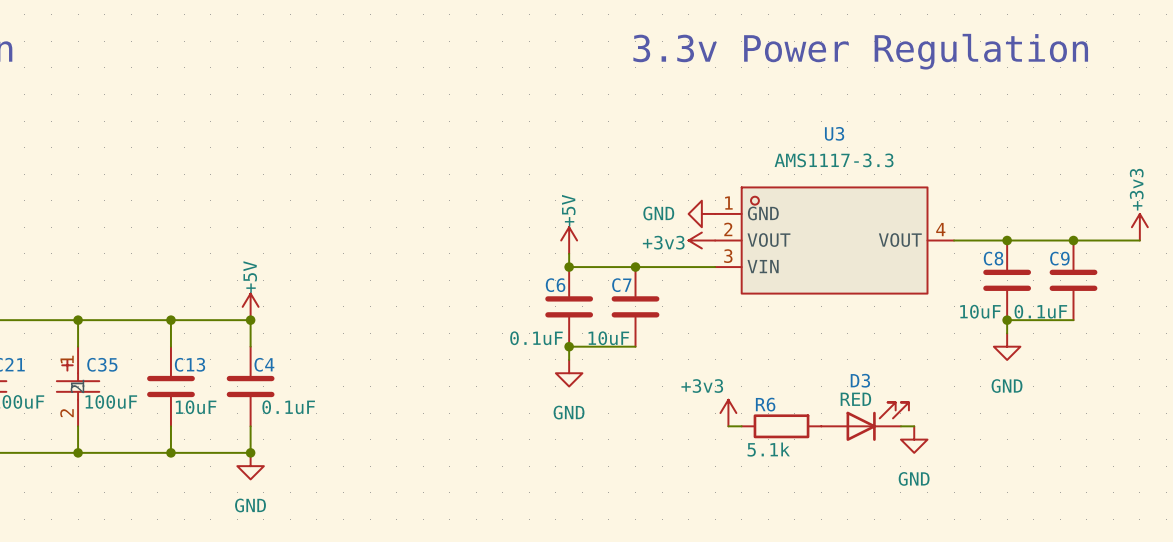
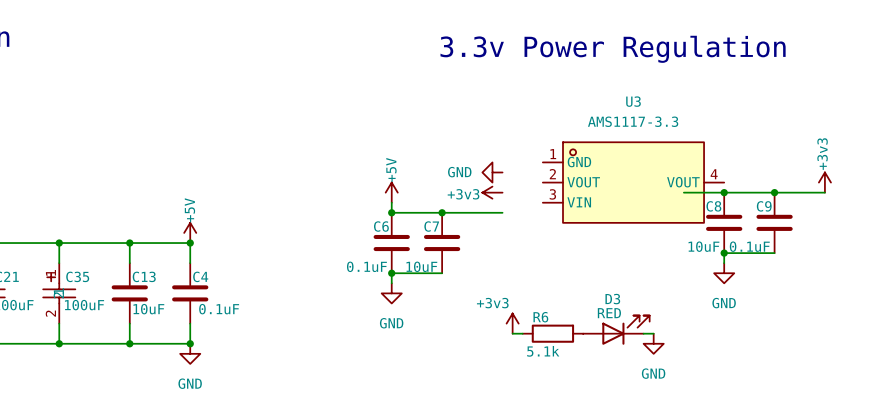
text position: 3.3v Power Regulation (860, 51) -> 3.3v Power Regulation (613, 49)
power symbol position: GND (701, 213) -> GND (492, 172)
power symbol position: +3v3 (1139, 227) -> +3v3 (824, 182)
power symbol position: +5V (569, 240) -> +5V (391, 192)
power symbol position: +3v3 (701, 240) -> +3v3 (492, 192)
wire: (954, 240) (1139, 240) -> (683, 192) (824, 192)
junction position: (1007, 240) -> (774, 192)
junction: (1073, 240) -> none
wire: (569, 253) (569, 267) (715, 267) -> (391, 202) (391, 212) (502, 212)
junction: none -> (724, 192)
junction position: (569, 267) -> (442, 212)
junction: (635, 267) -> none
junction: none -> (391, 212)
C8 position: (1007, 280) -> (724, 222)
C9 position: (1073, 280) -> (774, 222)
C6 position: (569, 306) -> (391, 243)
C7 position: (635, 306) -> (442, 243)
junction: (1007, 320) -> none
wire: (1073, 320) (1007, 320) (1007, 333) -> (774, 253) (724, 253) (724, 263)
junction: none -> (724, 253)
junction: (569, 346) -> none
wire: (635, 346) (569, 346) (569, 359) -> (442, 273) (391, 273) (391, 283)
power symbol: GND (1007, 346) -> none
junction: none -> (391, 273)
power symbol: none -> GND (724, 273)
power symbol position: GND (569, 373) -> GND (391, 293)
power symbol position: +3v3 (728, 413) -> +3v3 (512, 323)
D3 position: (865, 421) -> (616, 330)
wire: (728, 426) (741, 426) -> (512, 333) (522, 333)
R6 position: (781, 426) -> (552, 333)
wire: (900, 426) (914, 426) -> (643, 333) (653, 333)
power symbol: GND (914, 439) -> none
power symbol: none -> GND (653, 343)

